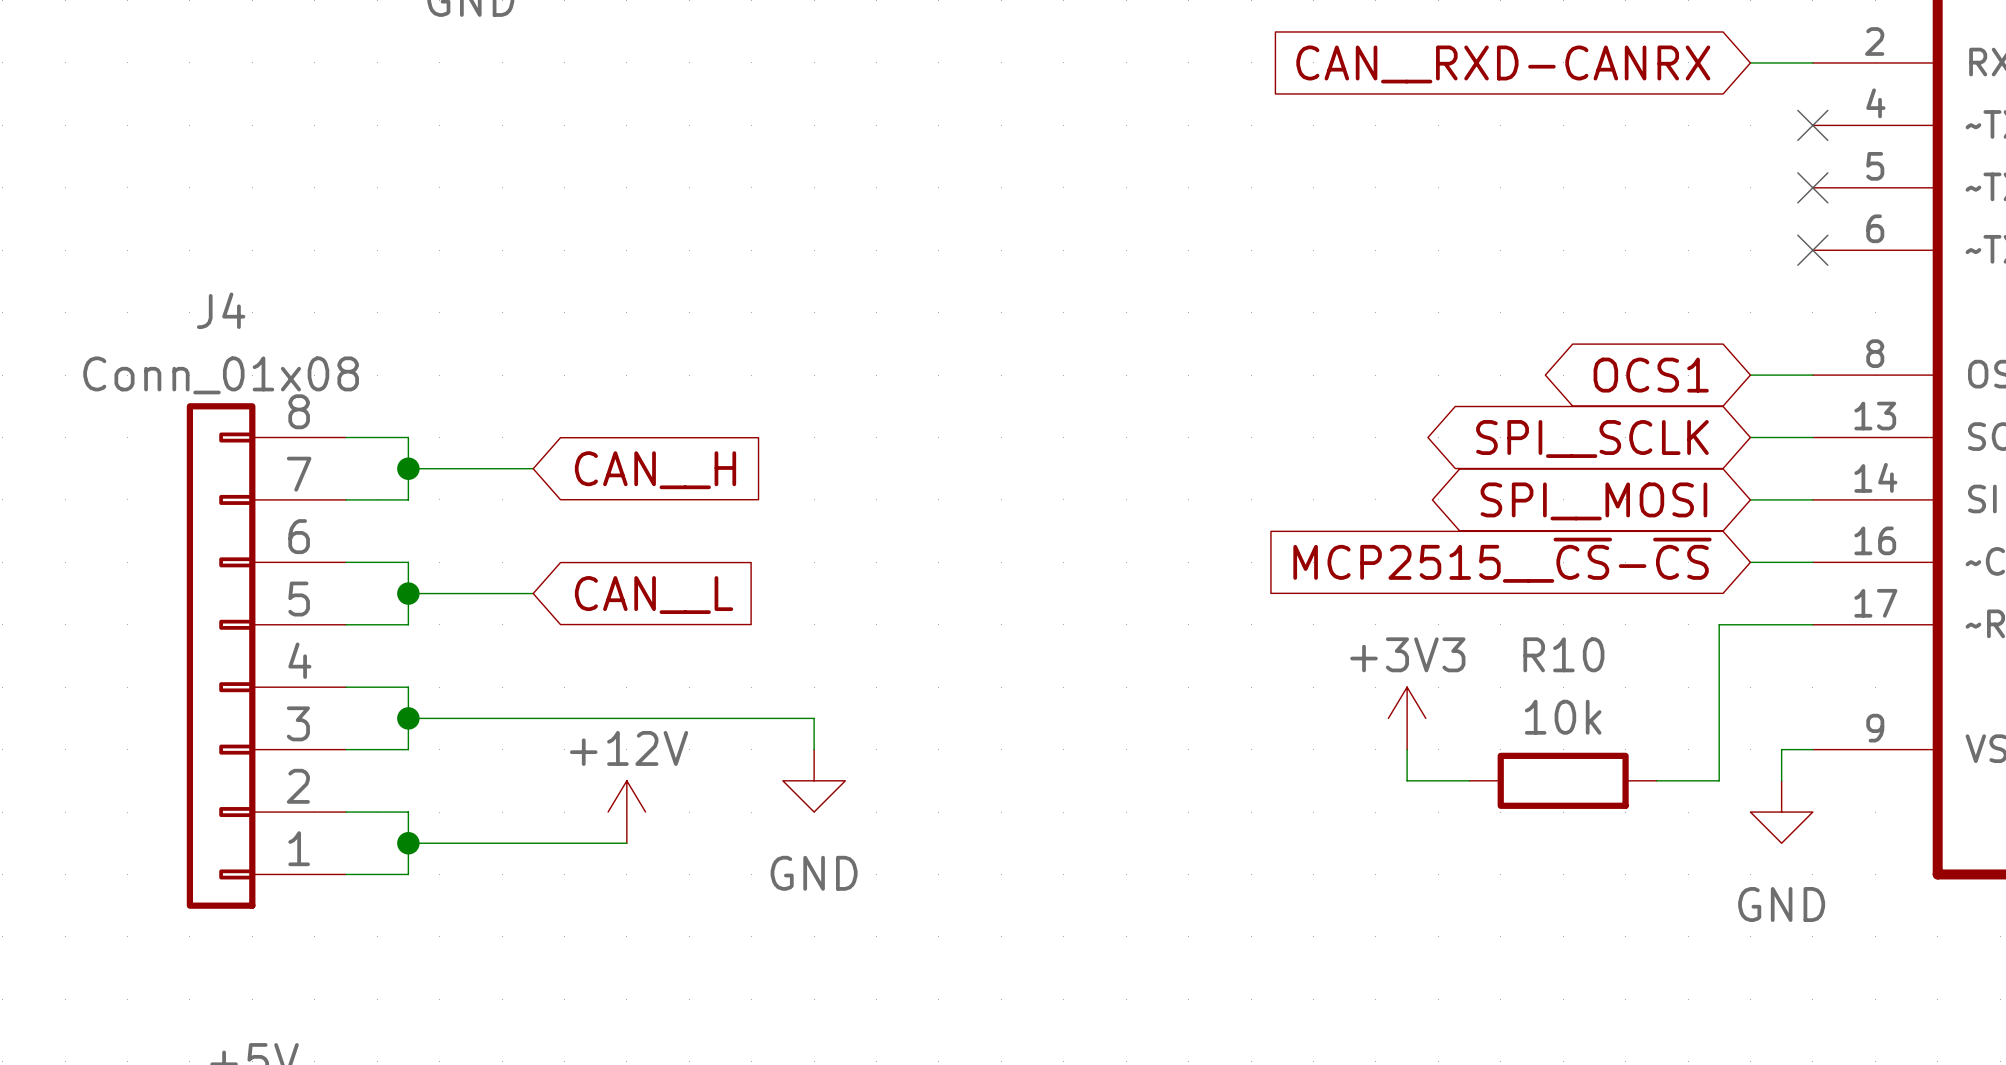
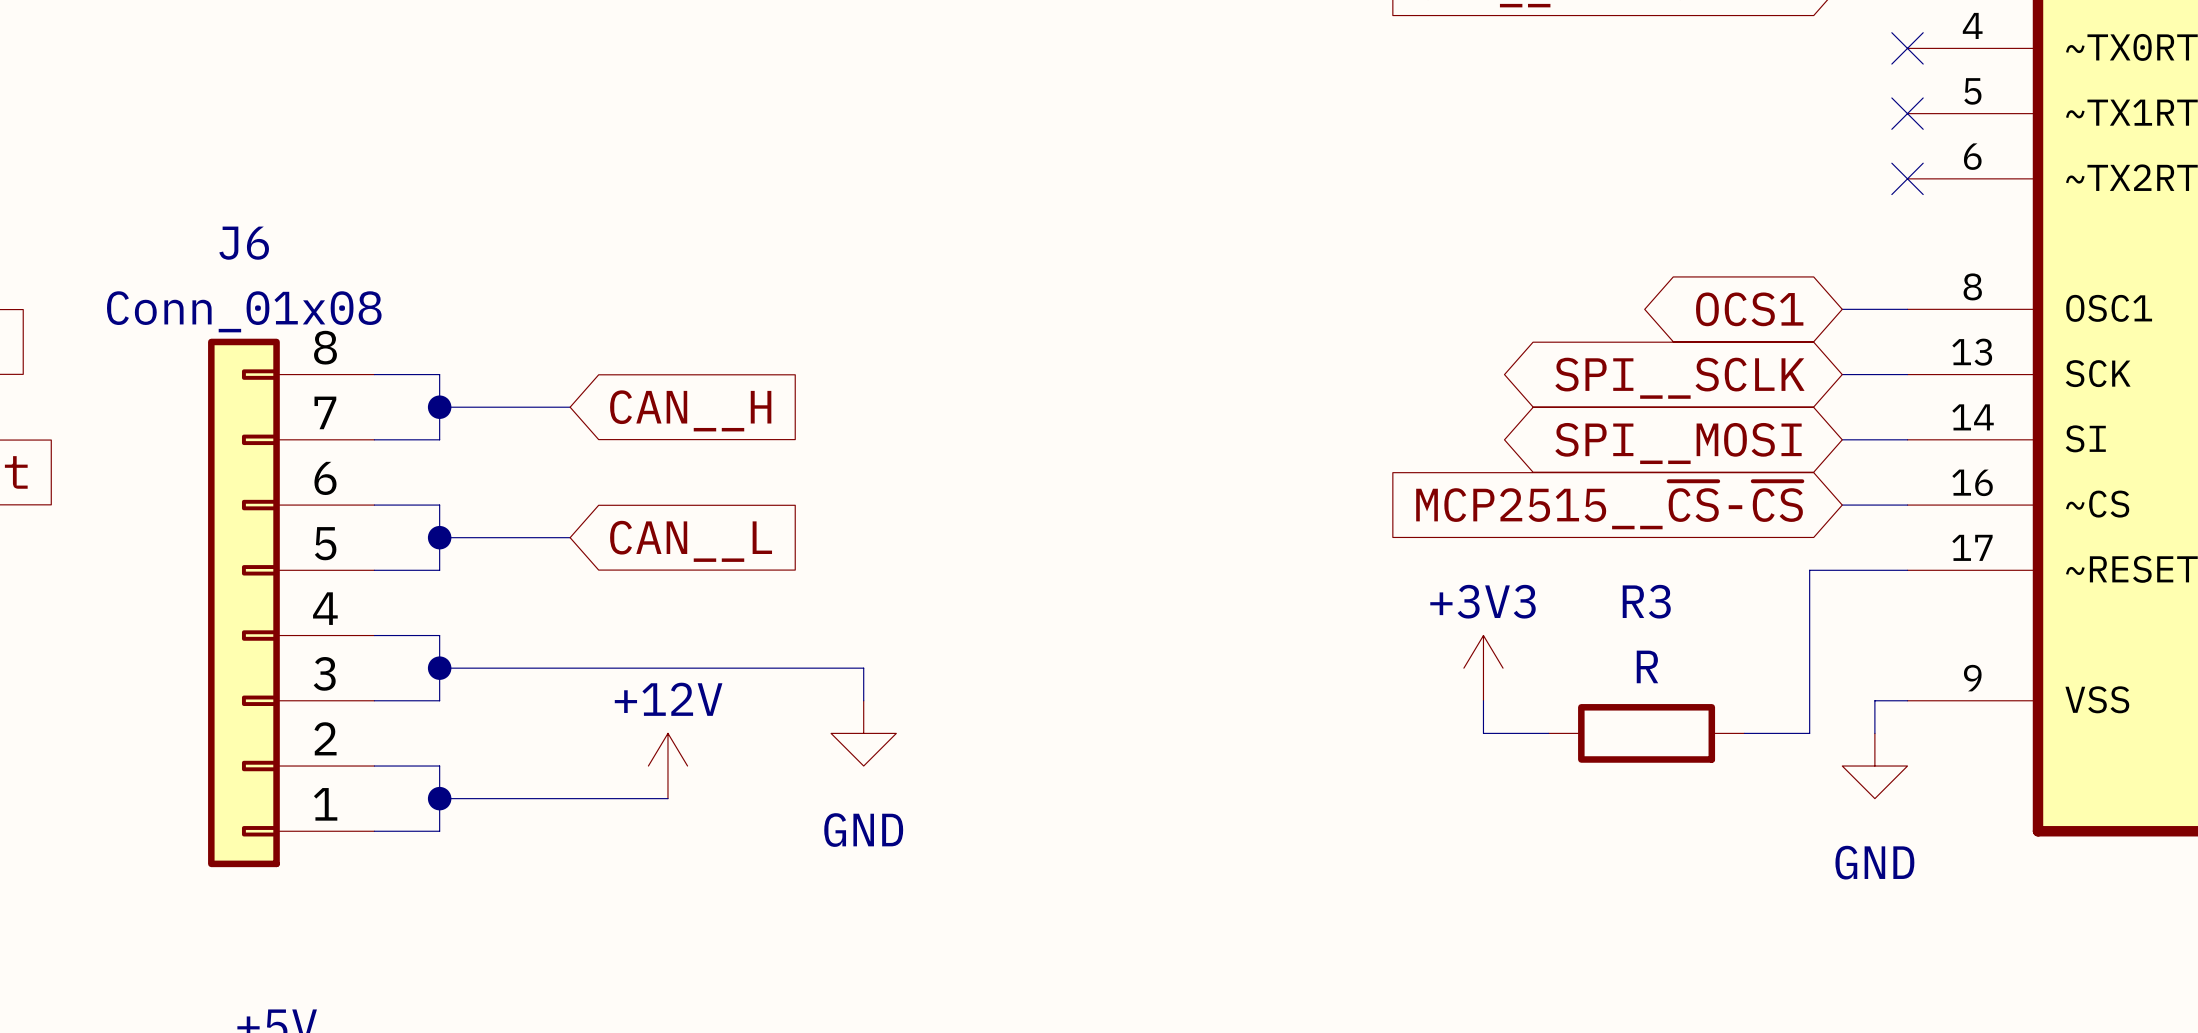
J4 name: J4 (221, 310) -> J6 (244, 243)
R10 name: R10 (1563, 654) -> R3 (1646, 601)
R10 value: 10k (1563, 717) -> R (1647, 666)

